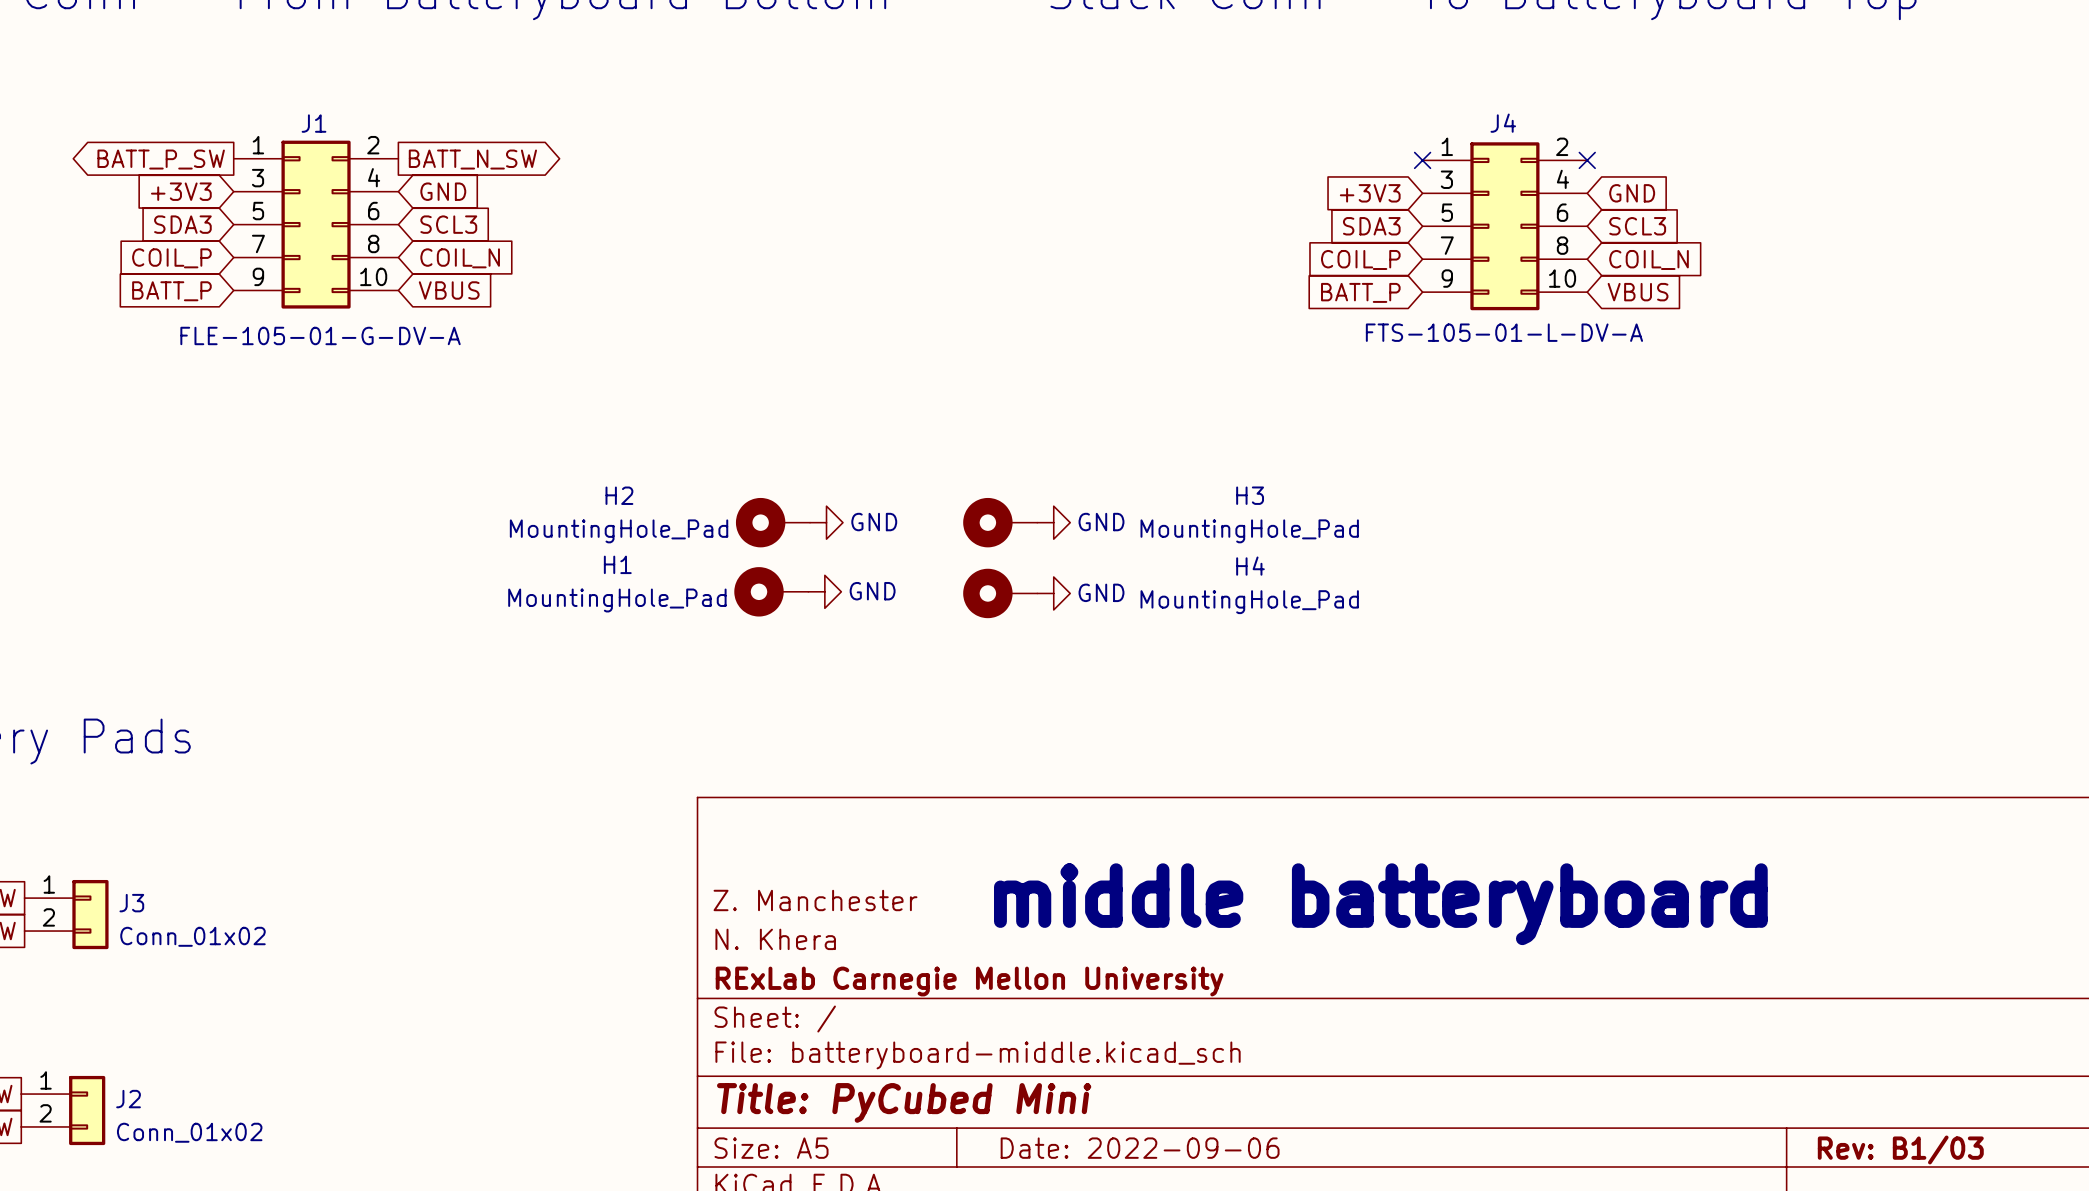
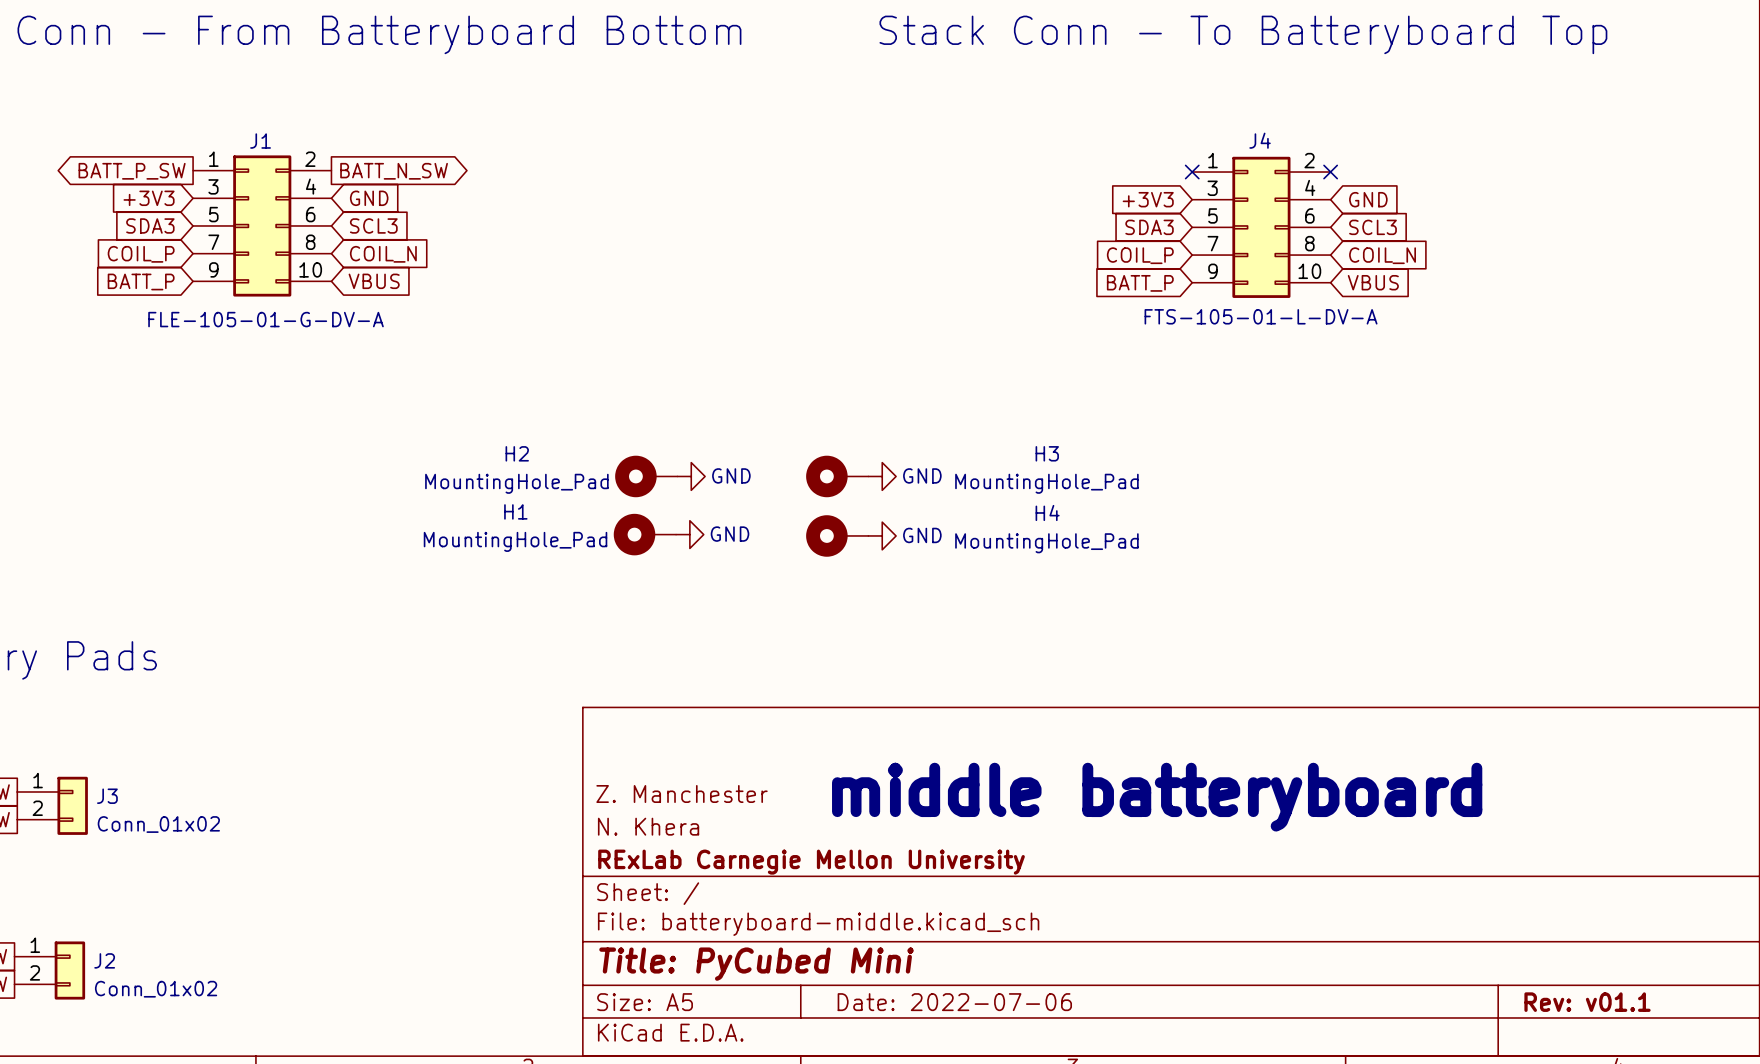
title block: Date: 2022-09-06 (1140, 1148) -> Date: 2022-07-06 (954, 1002)
title block: Rev: B1/03 (1900, 1149) -> Rev: v01.1 (1587, 1002)

